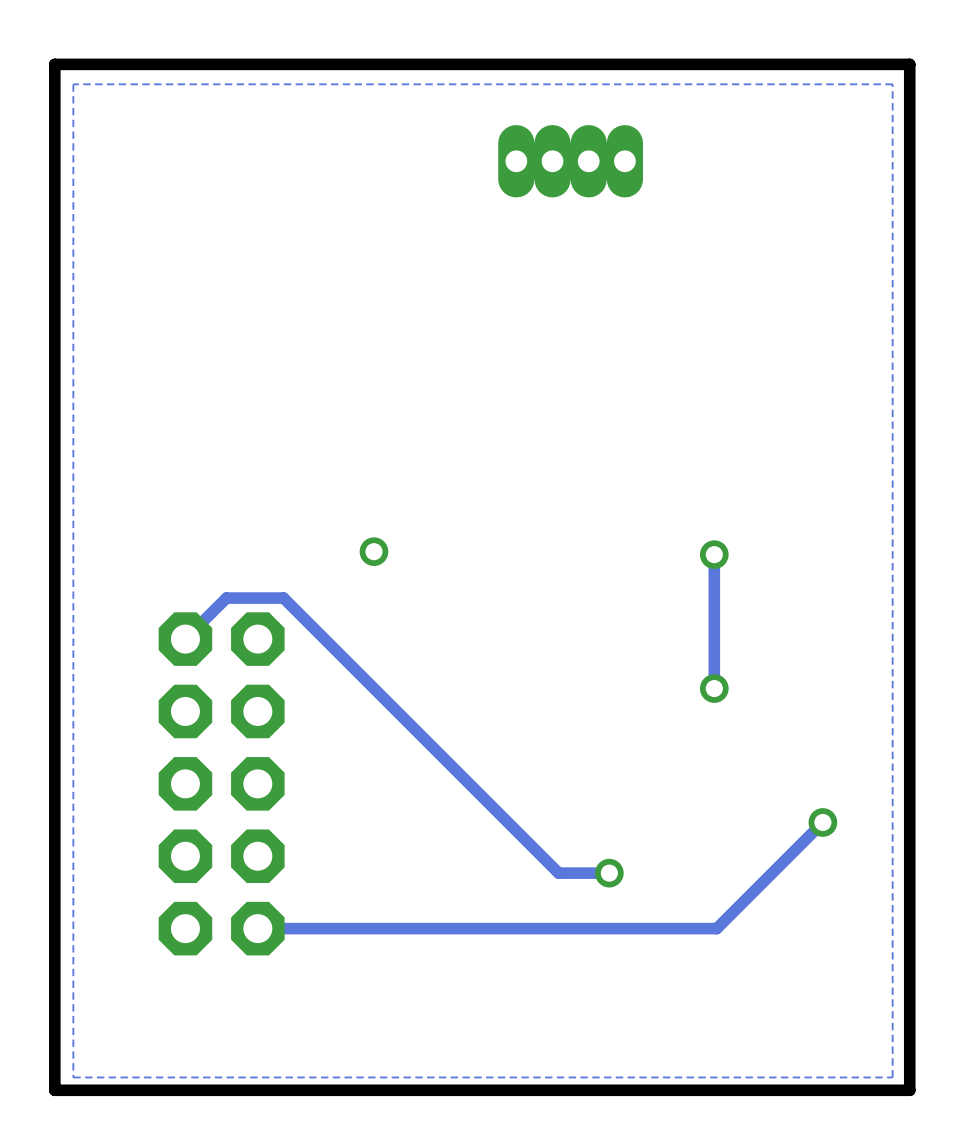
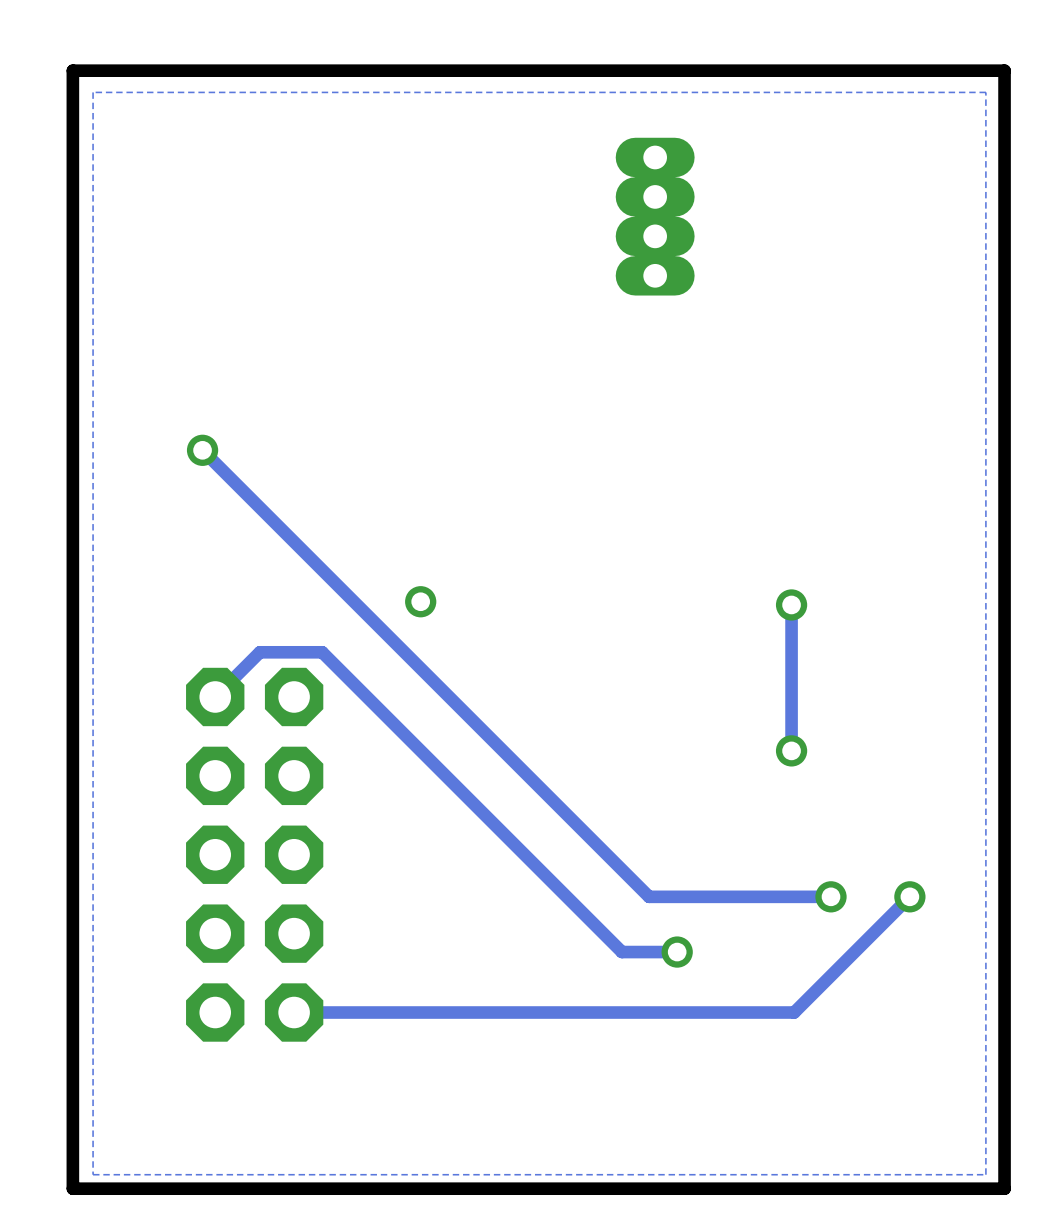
part rotation: 0° (570, 161) -> 90° clockwise (655, 216)
track: none -> (202, 450) (649, 896) (831, 896)
via: none -> (202, 450)
via: none -> (831, 896)

